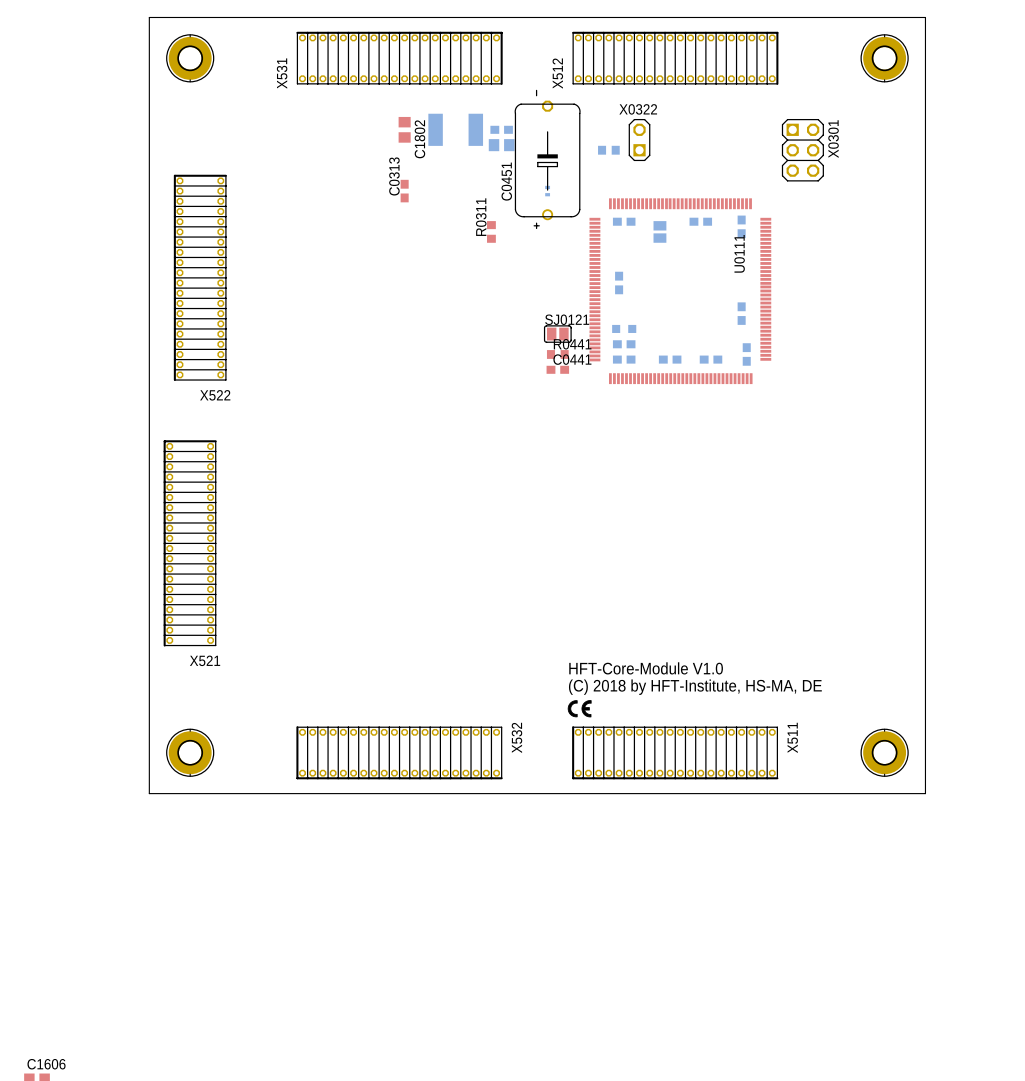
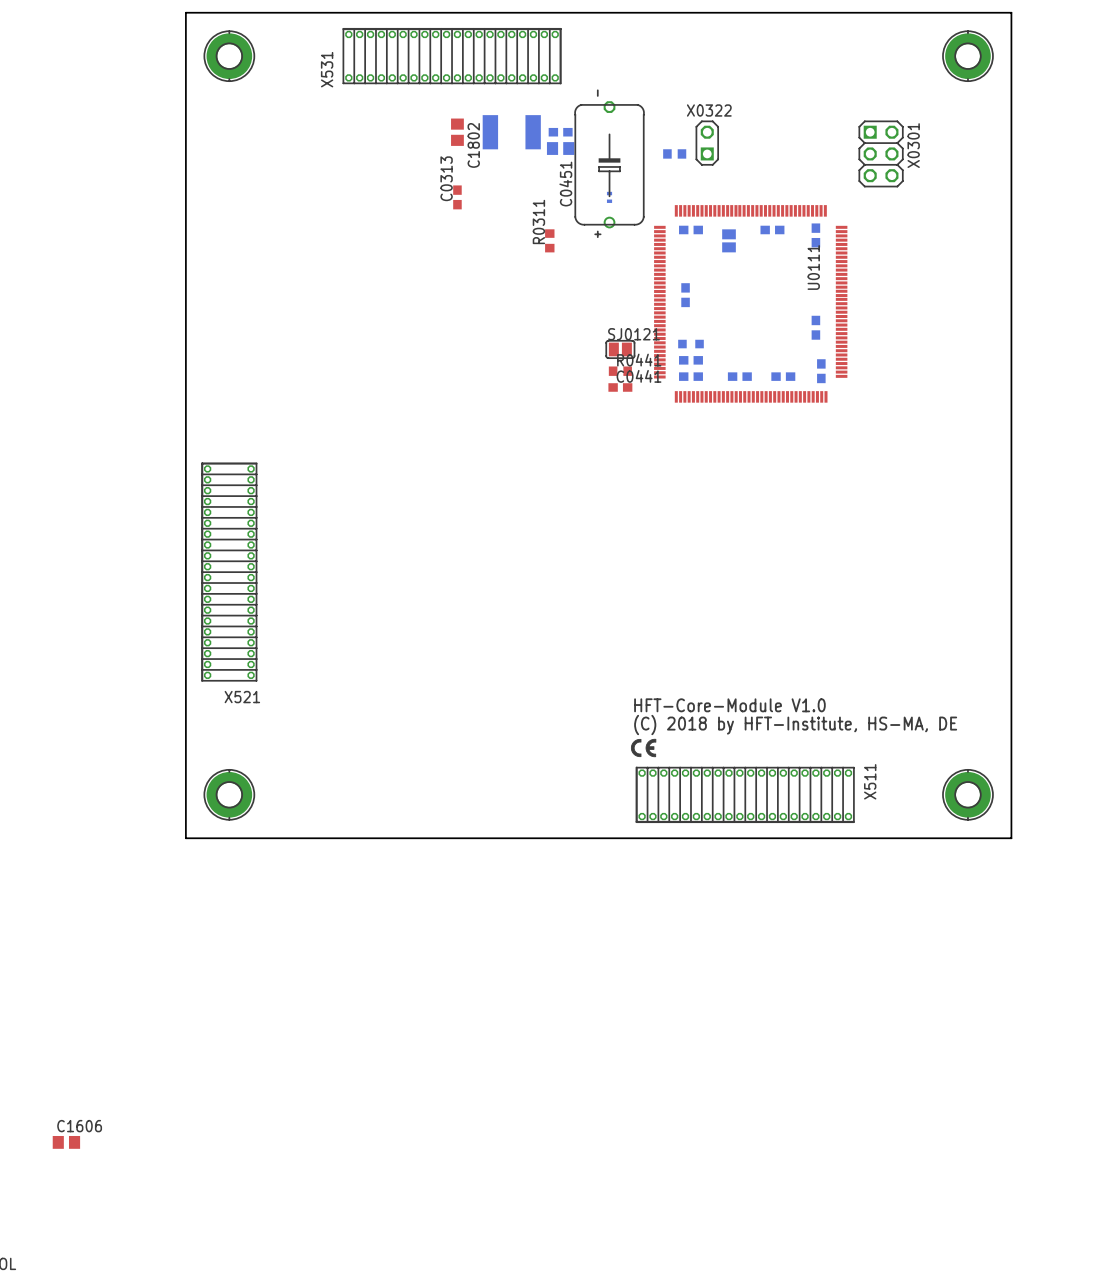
X512: (675, 58) -> none
X522: (200, 277) -> none
X532: (399, 752) -> none

